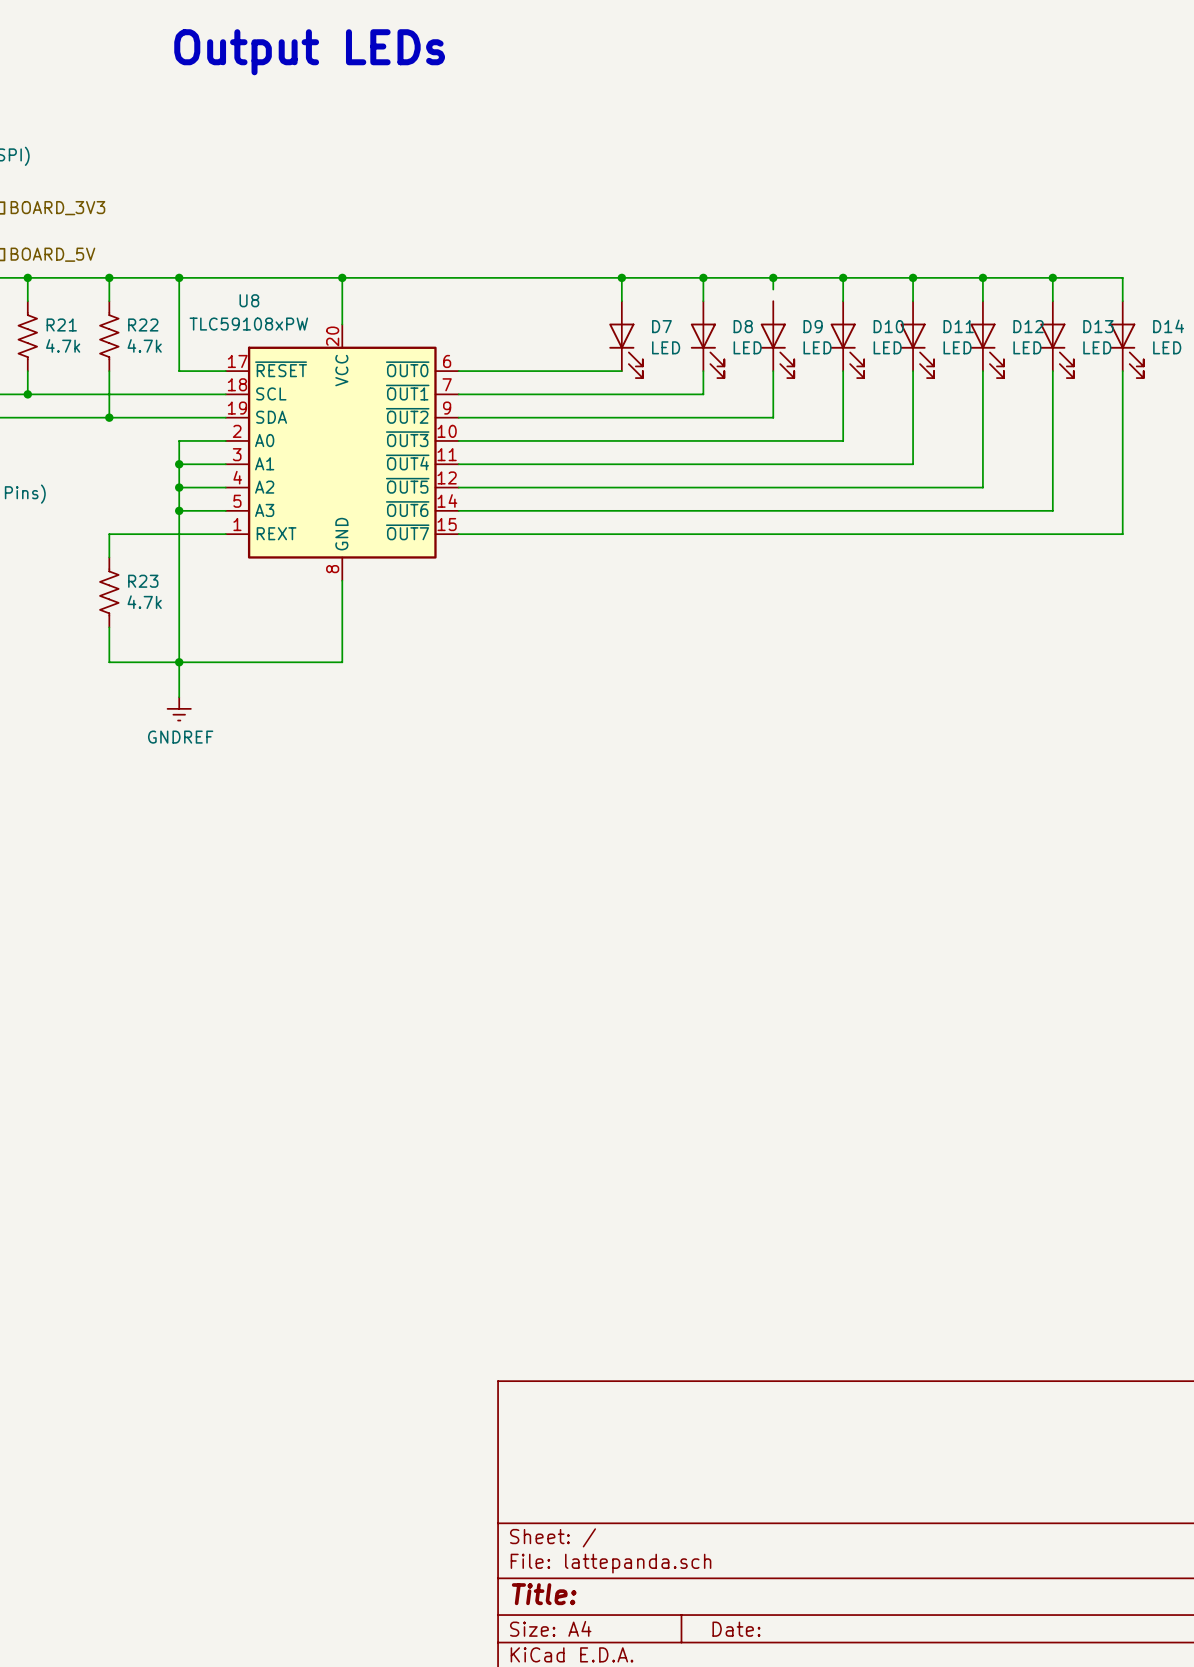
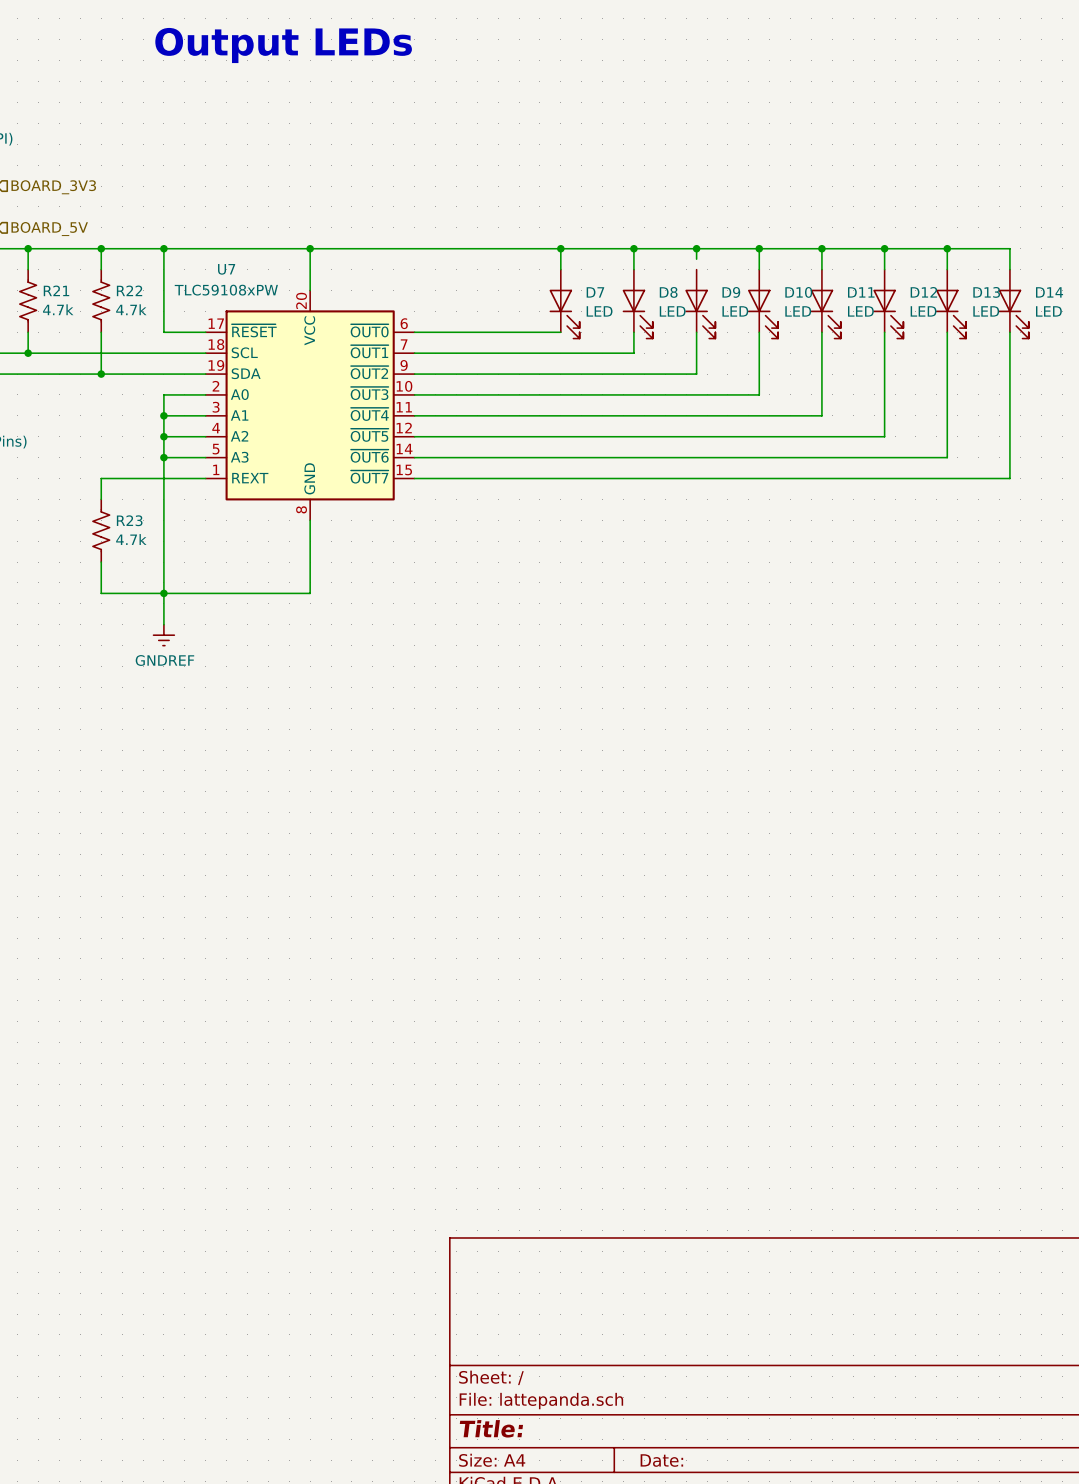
U8 name: U8 (249, 300) -> U7 (226, 269)

